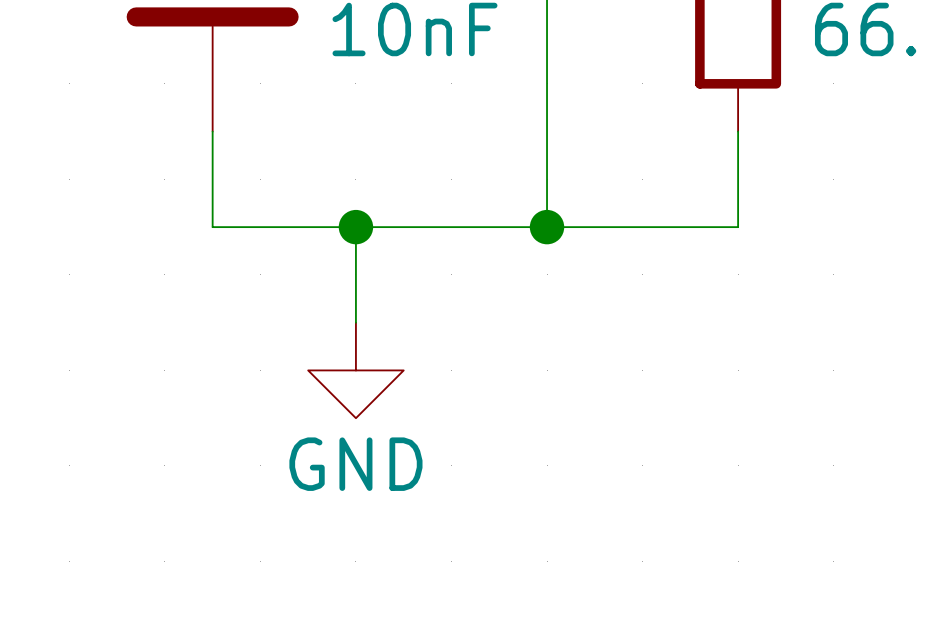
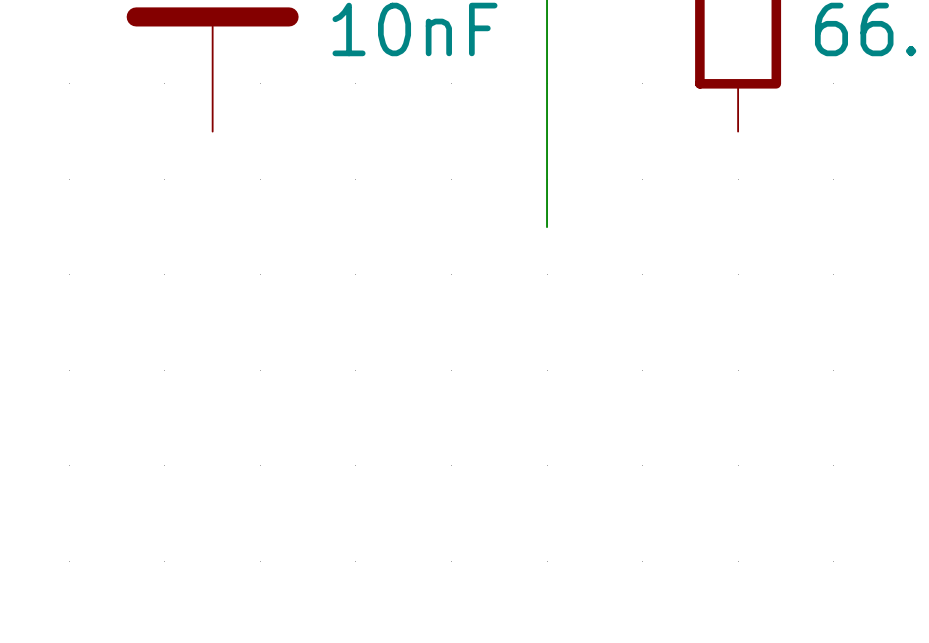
wire: (212, 131) (212, 227) (738, 227) (738, 131) -> none
wire: (355, 227) (355, 322) -> none
junction: (355, 227) -> none
junction: (547, 227) -> none
power symbol: GND (355, 370) -> none

